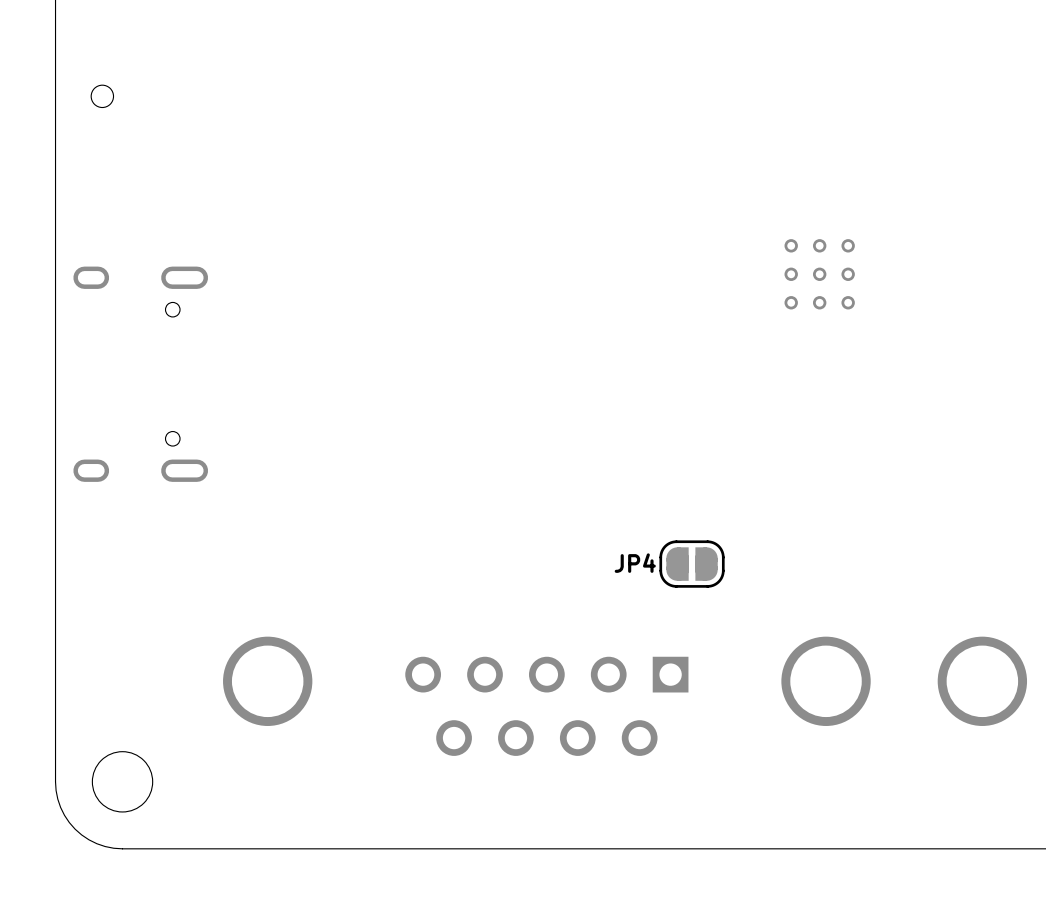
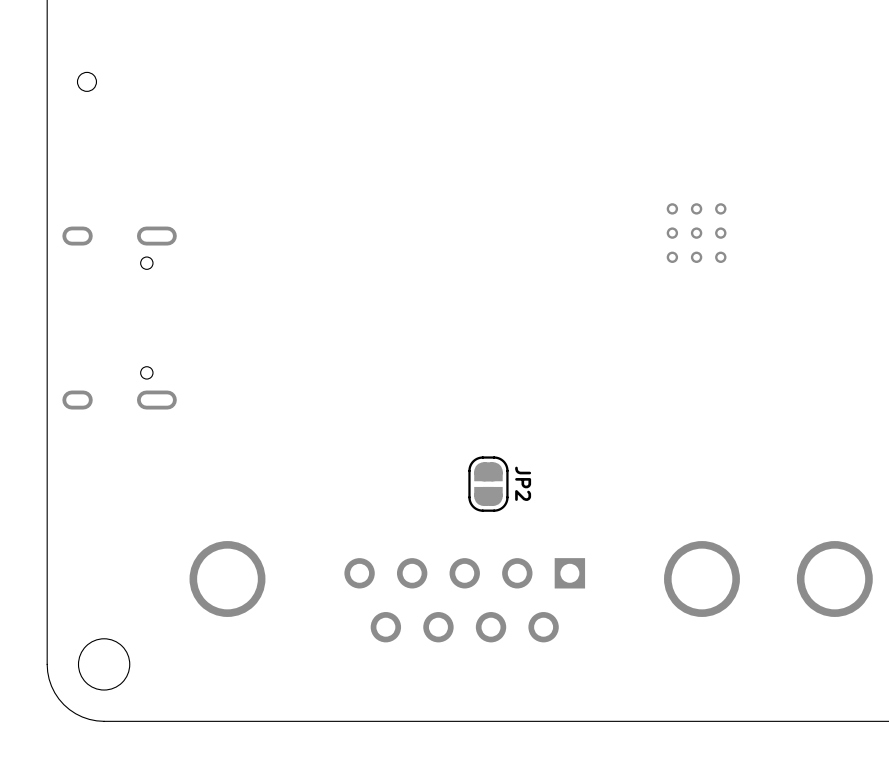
JP4: (692, 564) -> none
JP2: none -> (488, 484)

